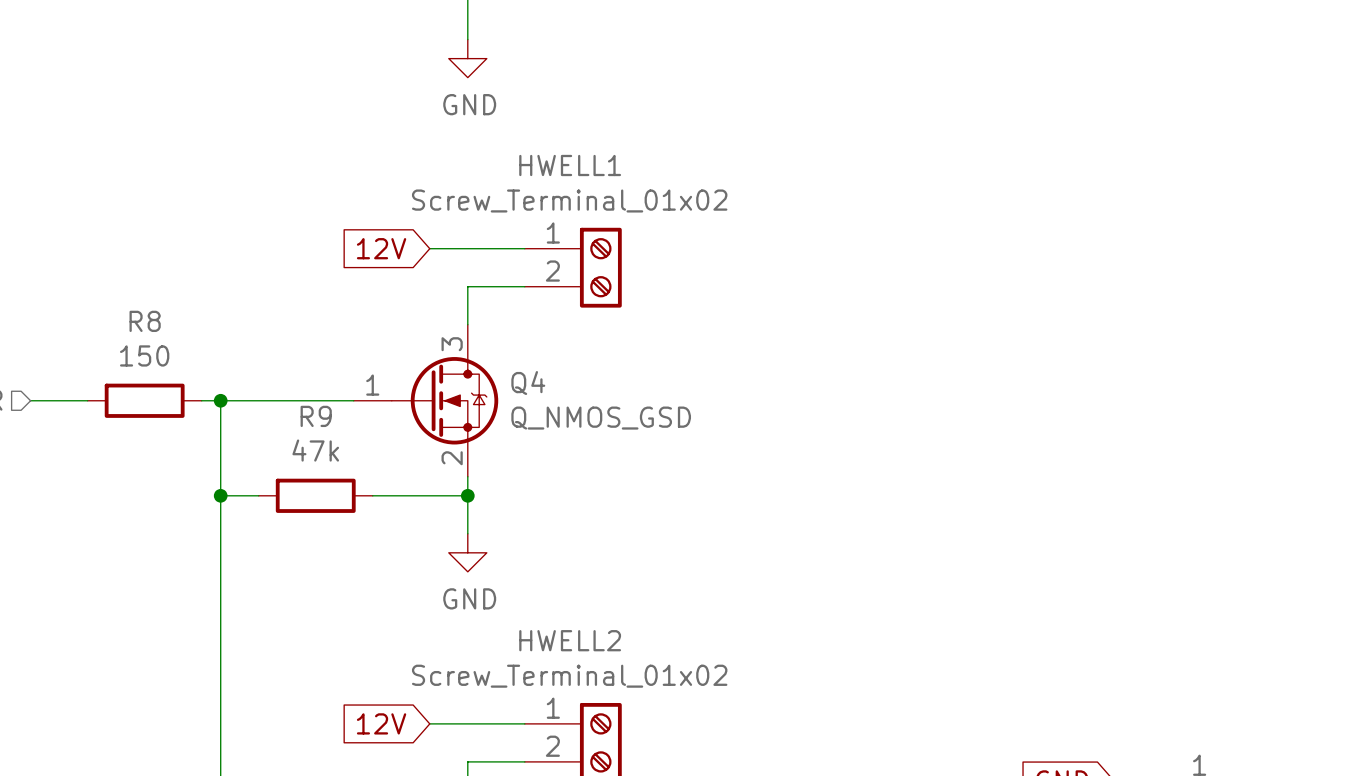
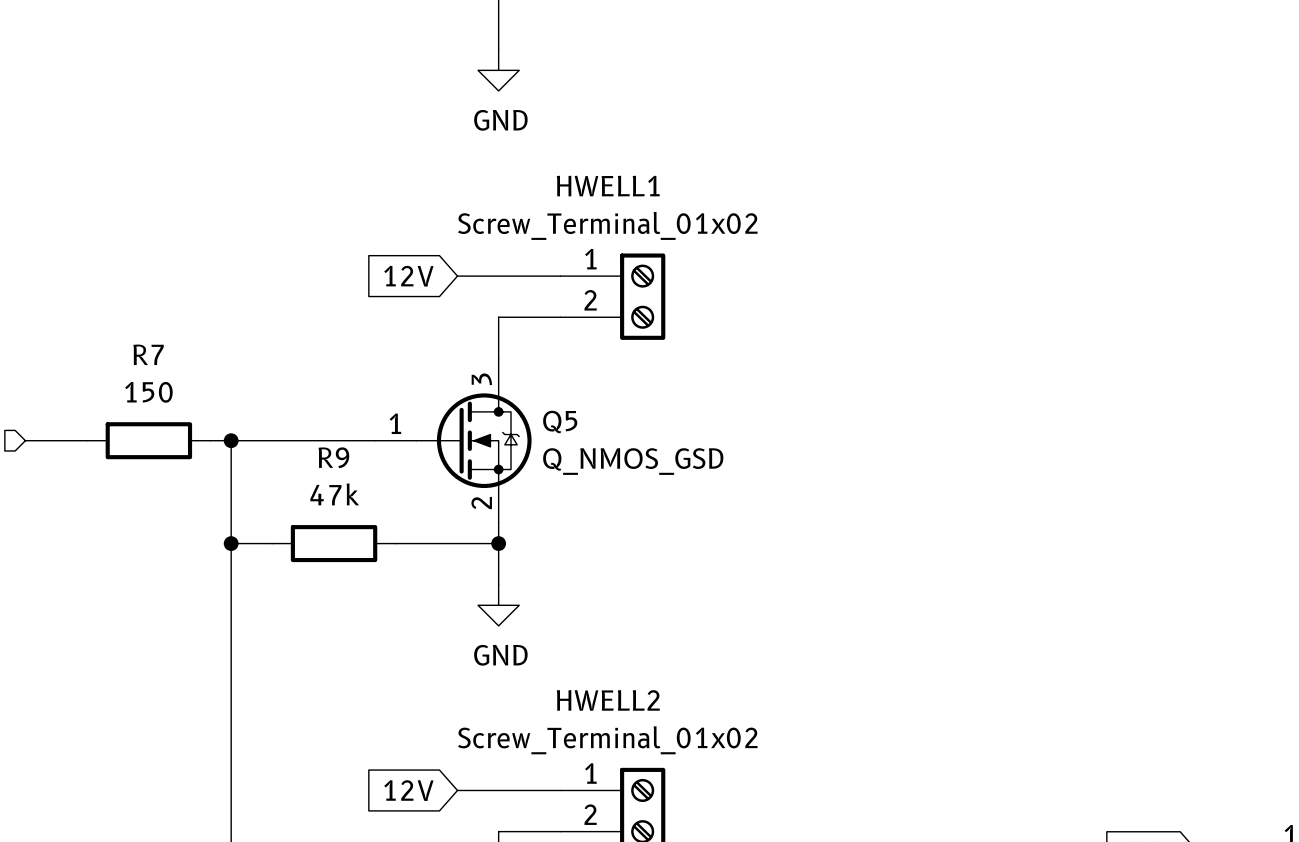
R8 name: R8 (145, 321) -> R7 (148, 354)
Q4 name: Q4 (528, 383) -> Q5 (560, 422)

